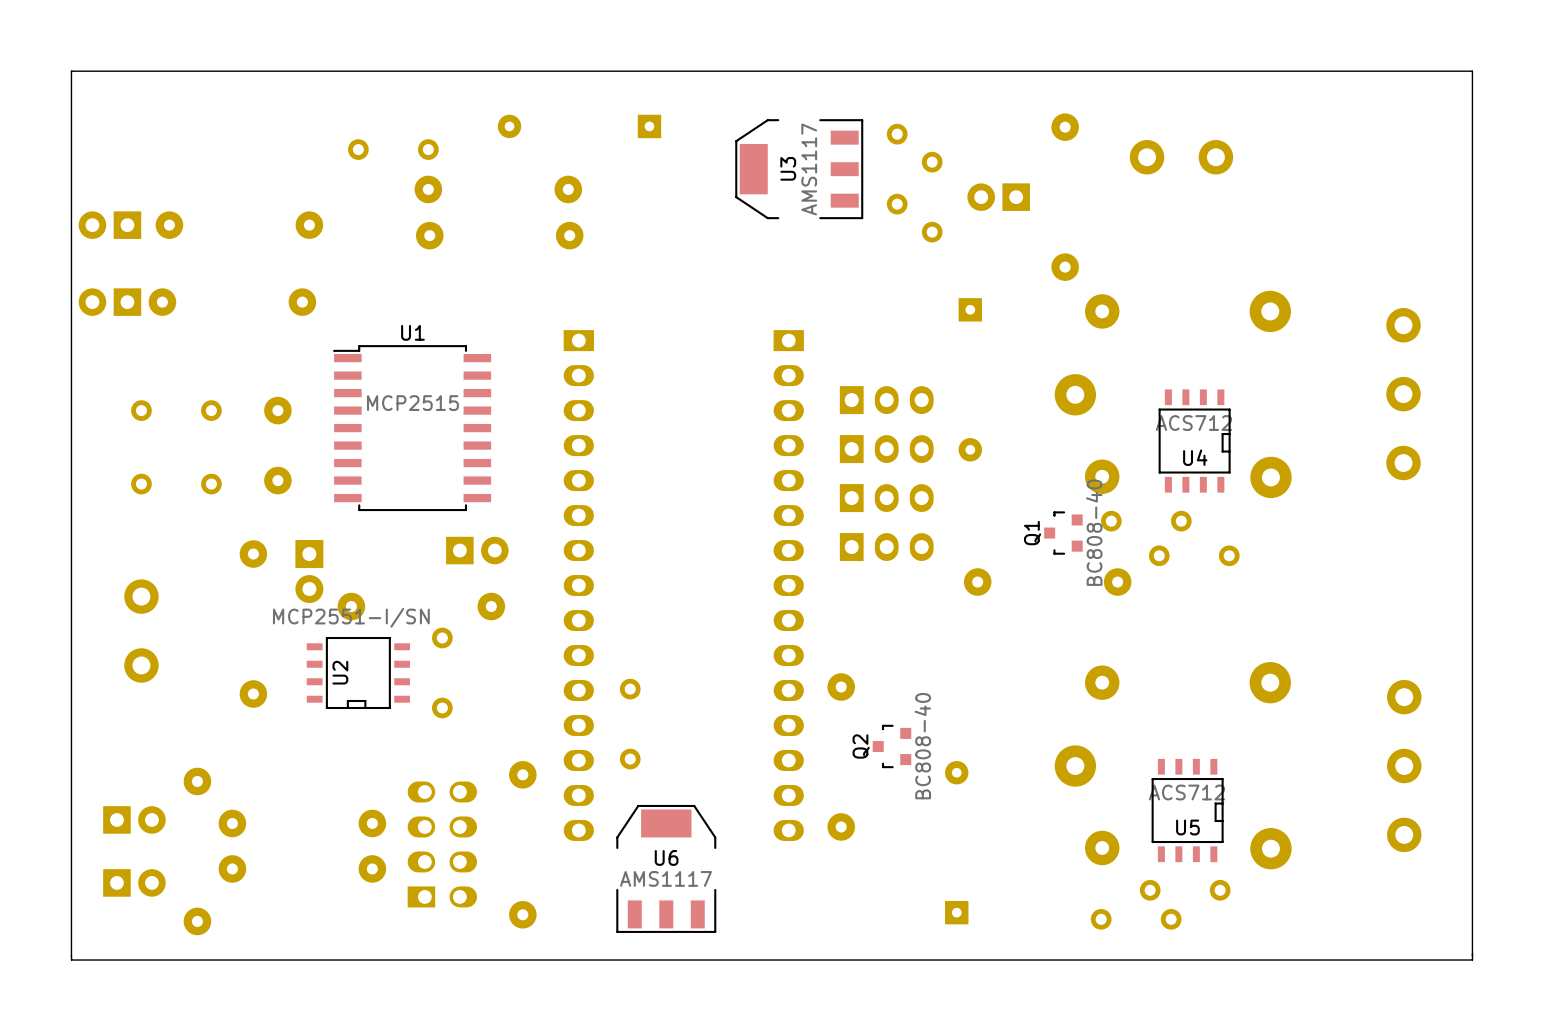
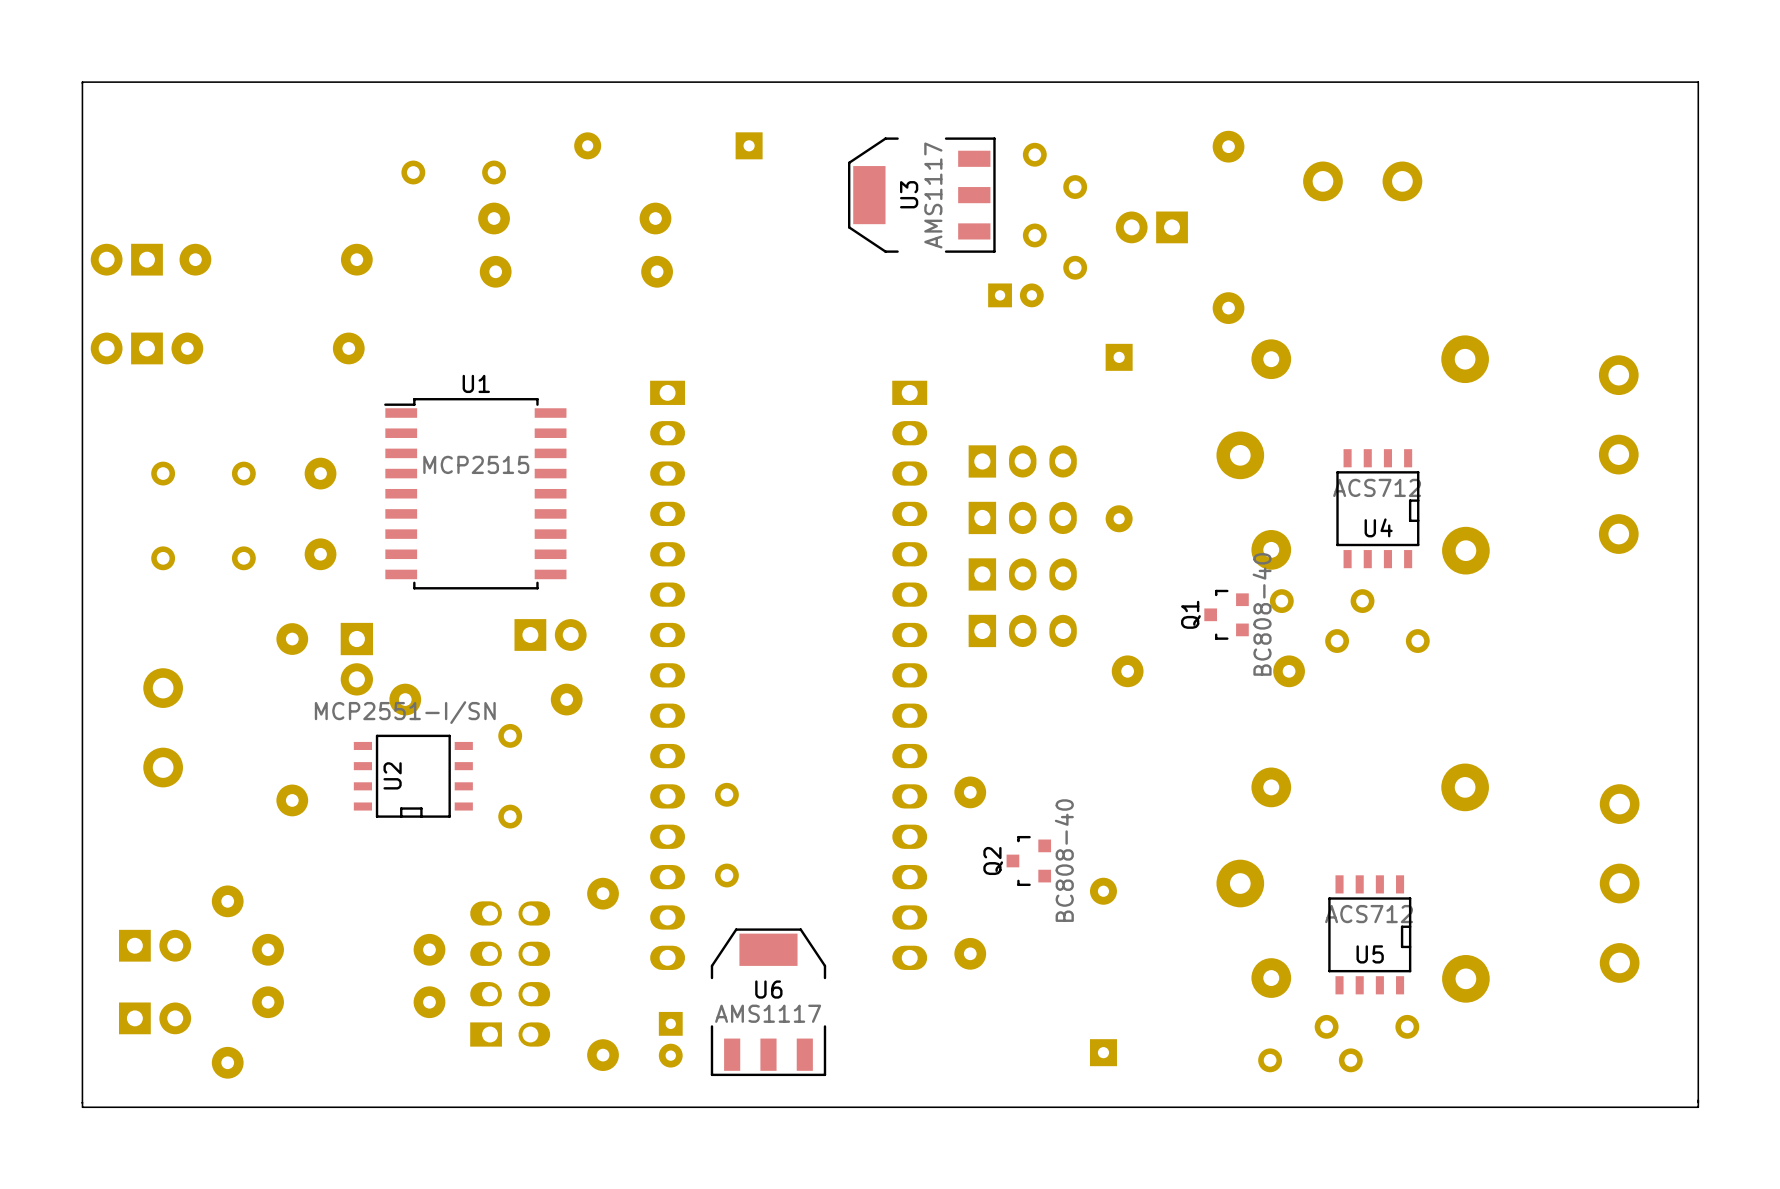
part: none -> (1015, 295)
part: none -> (670, 1039)

